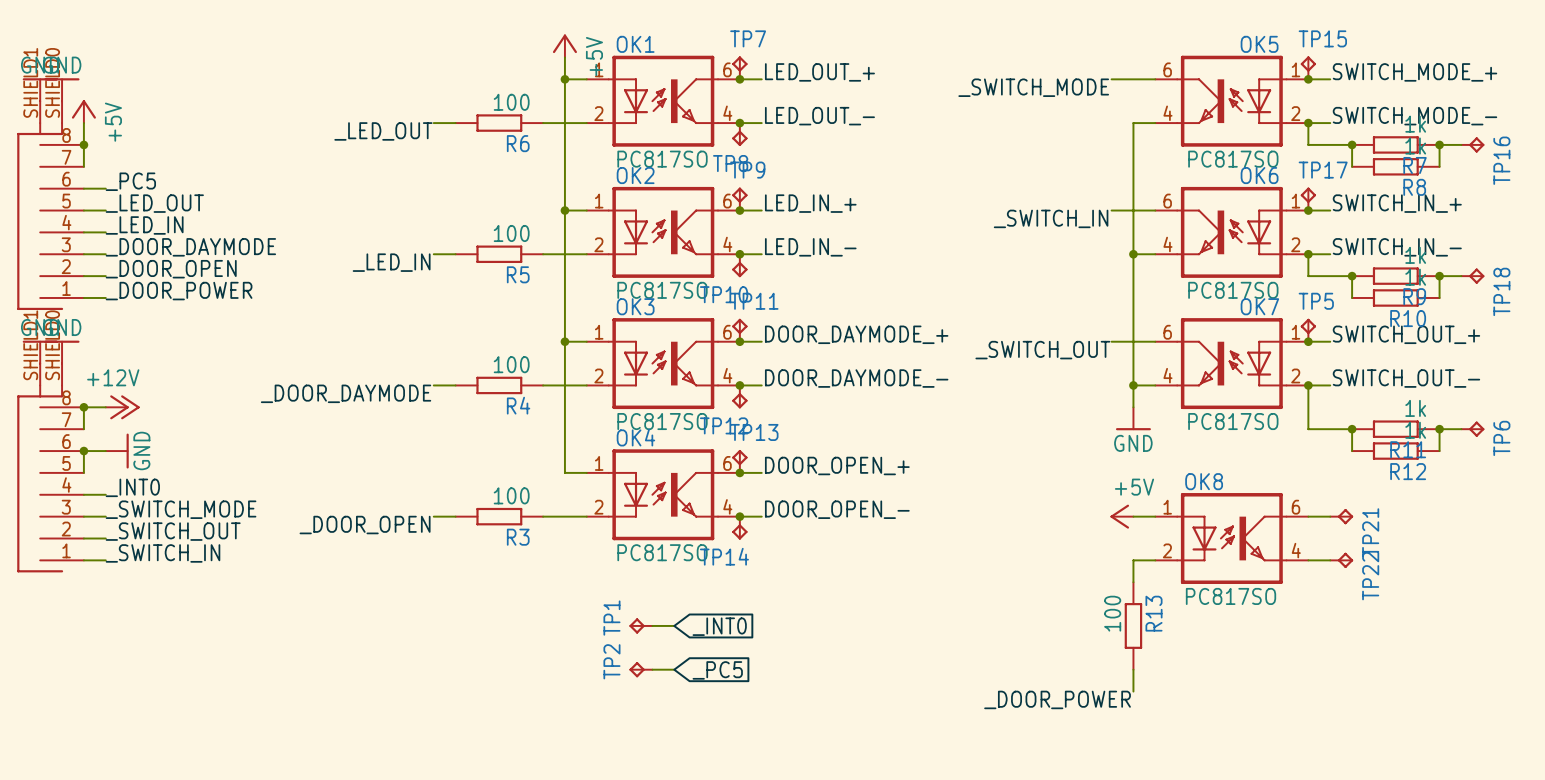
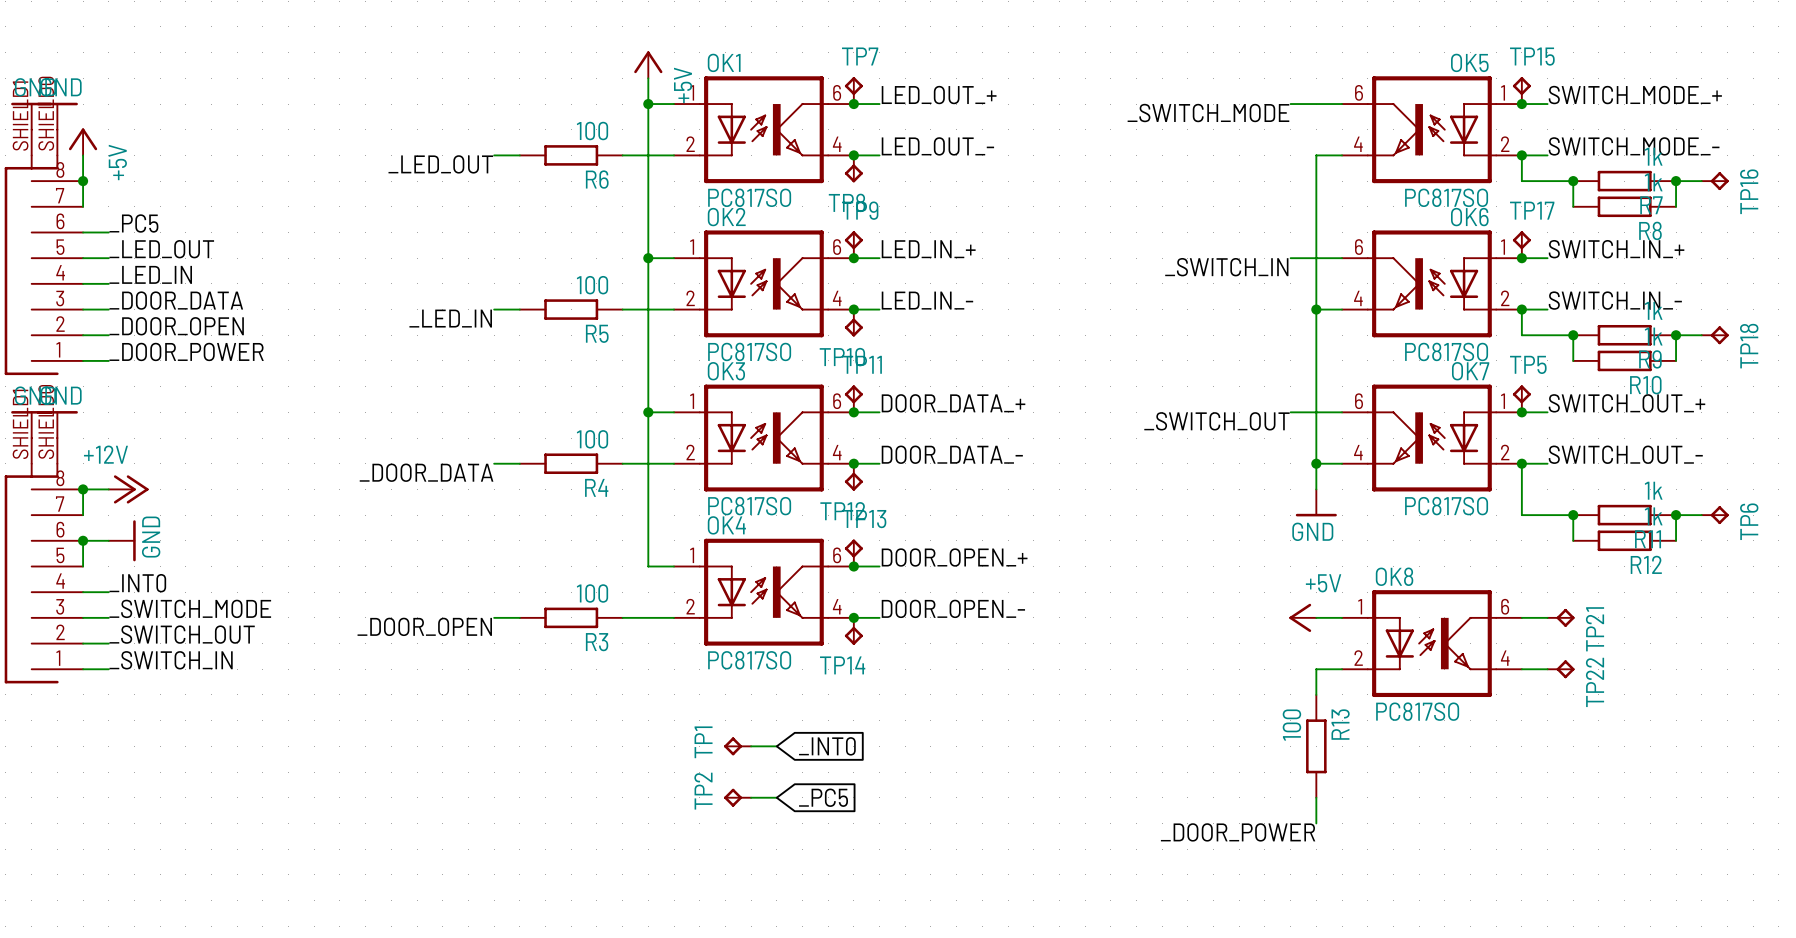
label: _DOOR_DAYMODE (190, 247) -> _DOOR_DATA (176, 300)
label: DOOR_DAYMODE_+ (856, 334) -> DOOR_DATA_+ (953, 403)
label: DOOR_DAYMODE_- (856, 378) -> DOOR_DATA_- (952, 454)
label: _DOOR_DAYMODE (346, 393) -> _DOOR_DATA (426, 472)

